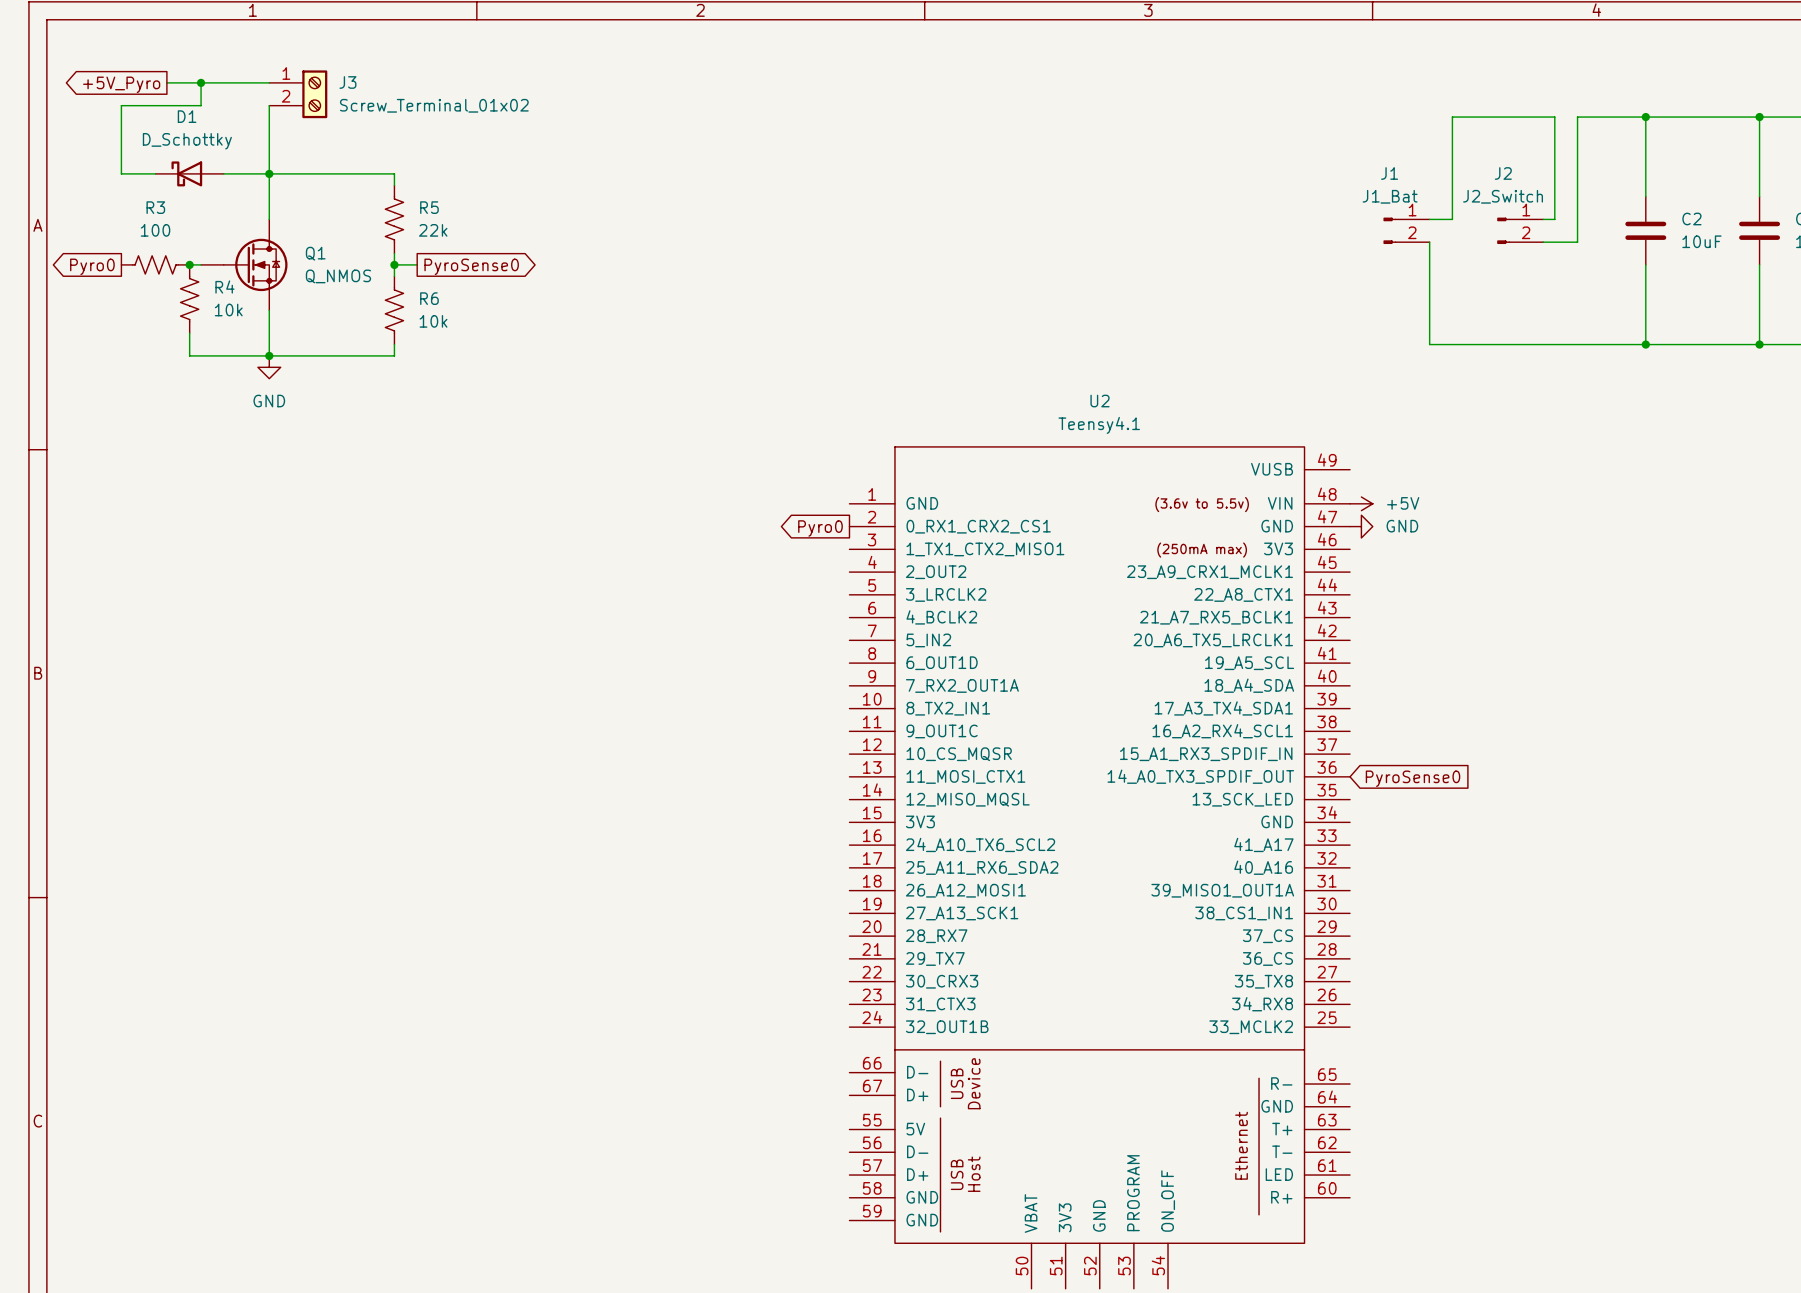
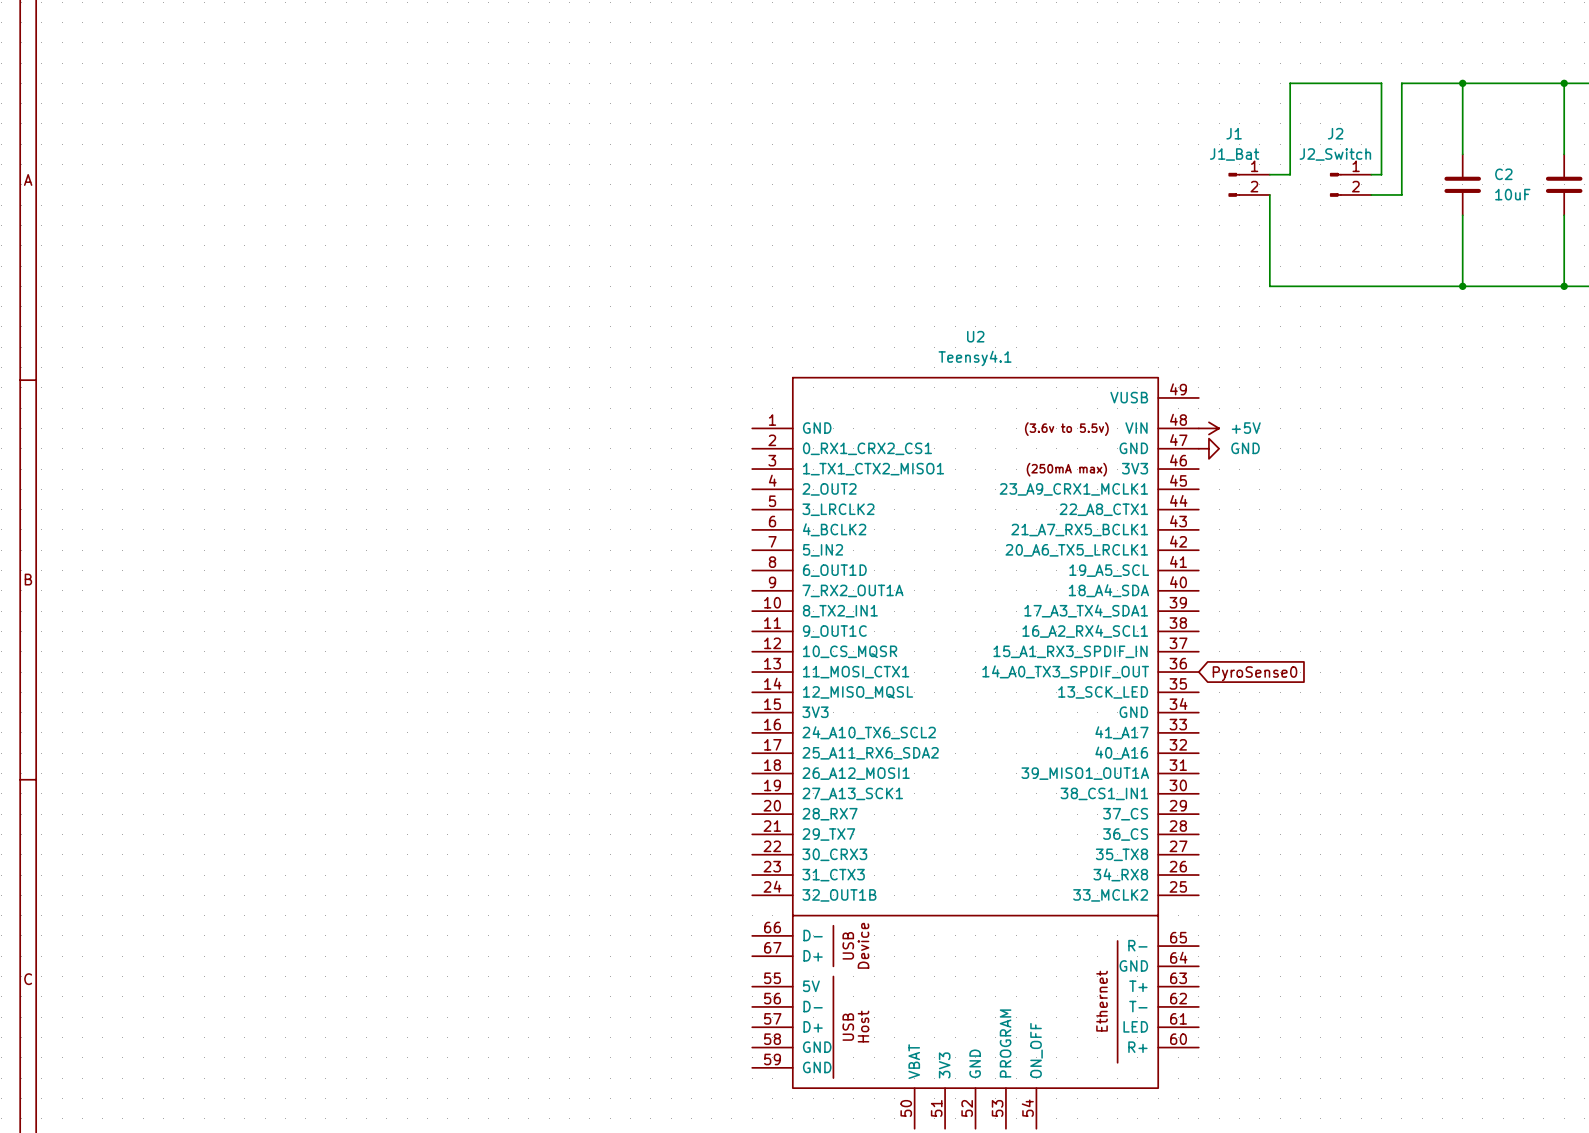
wire: (166, 82) (269, 82) -> none
wire: (201, 82) (201, 105) (121, 105) (121, 173) (155, 173) -> none
junction: (201, 82) -> none
global label: +5V_Pyro (121, 84) -> none
J3: Screw_Terminal_01x02 (298, 94) -> none
wire: (269, 105) (269, 219) -> none
D1: D_Schottky (189, 173) -> none
wire: (223, 173) (394, 173) (394, 185) -> none
junction: (269, 173) -> none
R5: 22k (394, 219) -> none
wire: (394, 253) (394, 276) -> none
R3: 100 (155, 264) -> none
wire: (189, 264) (201, 264) -> none
junction: (189, 264) -> none
Q1: Q_NMOS (244, 264) -> none
wire: (394, 264) (417, 264) -> none
junction: (394, 264) -> none
global label: Pyro0 (92, 266) -> none
global label: PyroSense0 (471, 266) -> none
R4: 10k (189, 299) -> none
wire: (269, 310) (269, 355) -> none
R6: 10k (394, 310) -> none
wire: (189, 333) (189, 355) (394, 355) (394, 344) -> none
junction: (269, 355) -> none
power symbol: GND (269, 367) -> none
global label: Pyro0 (820, 528) -> none

